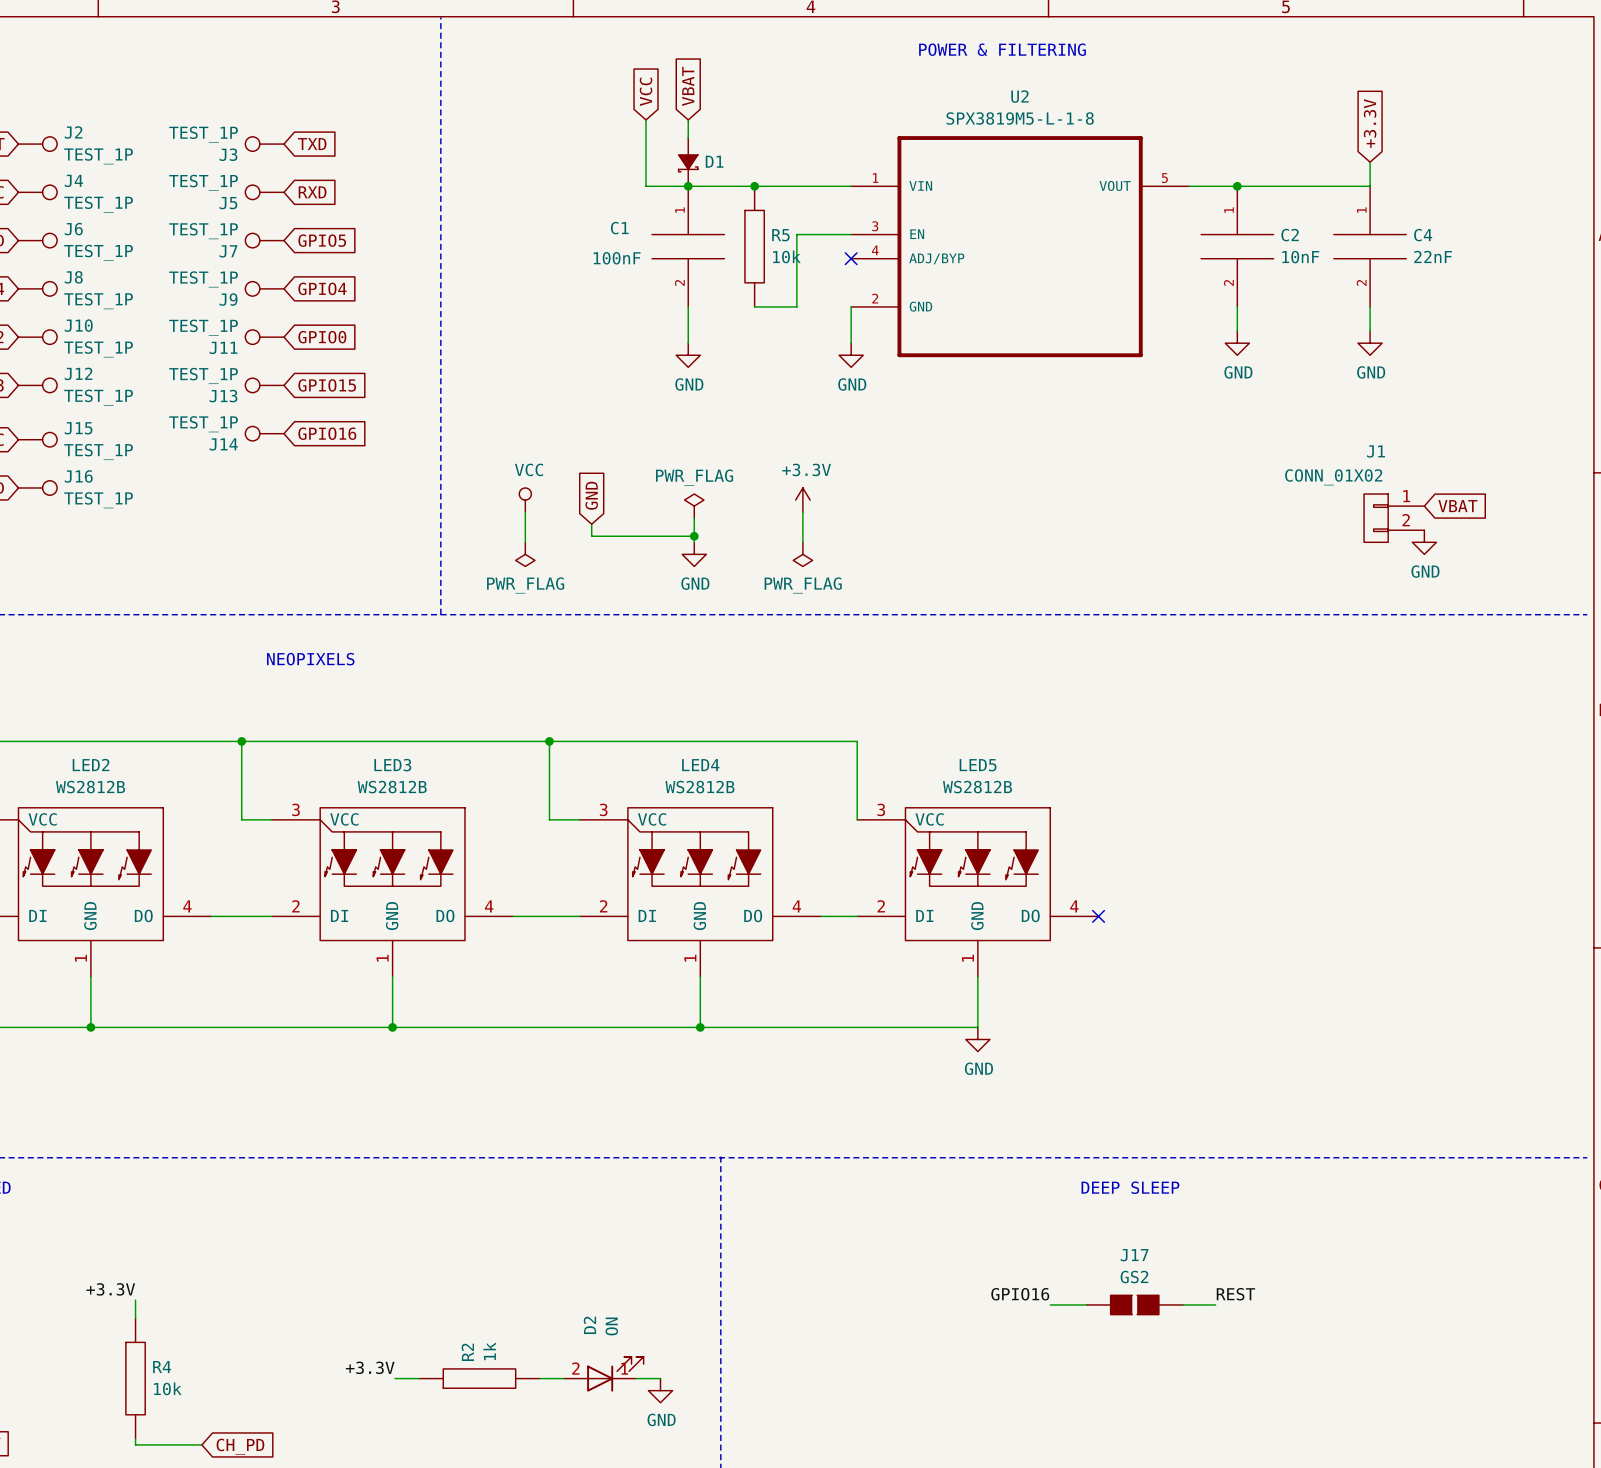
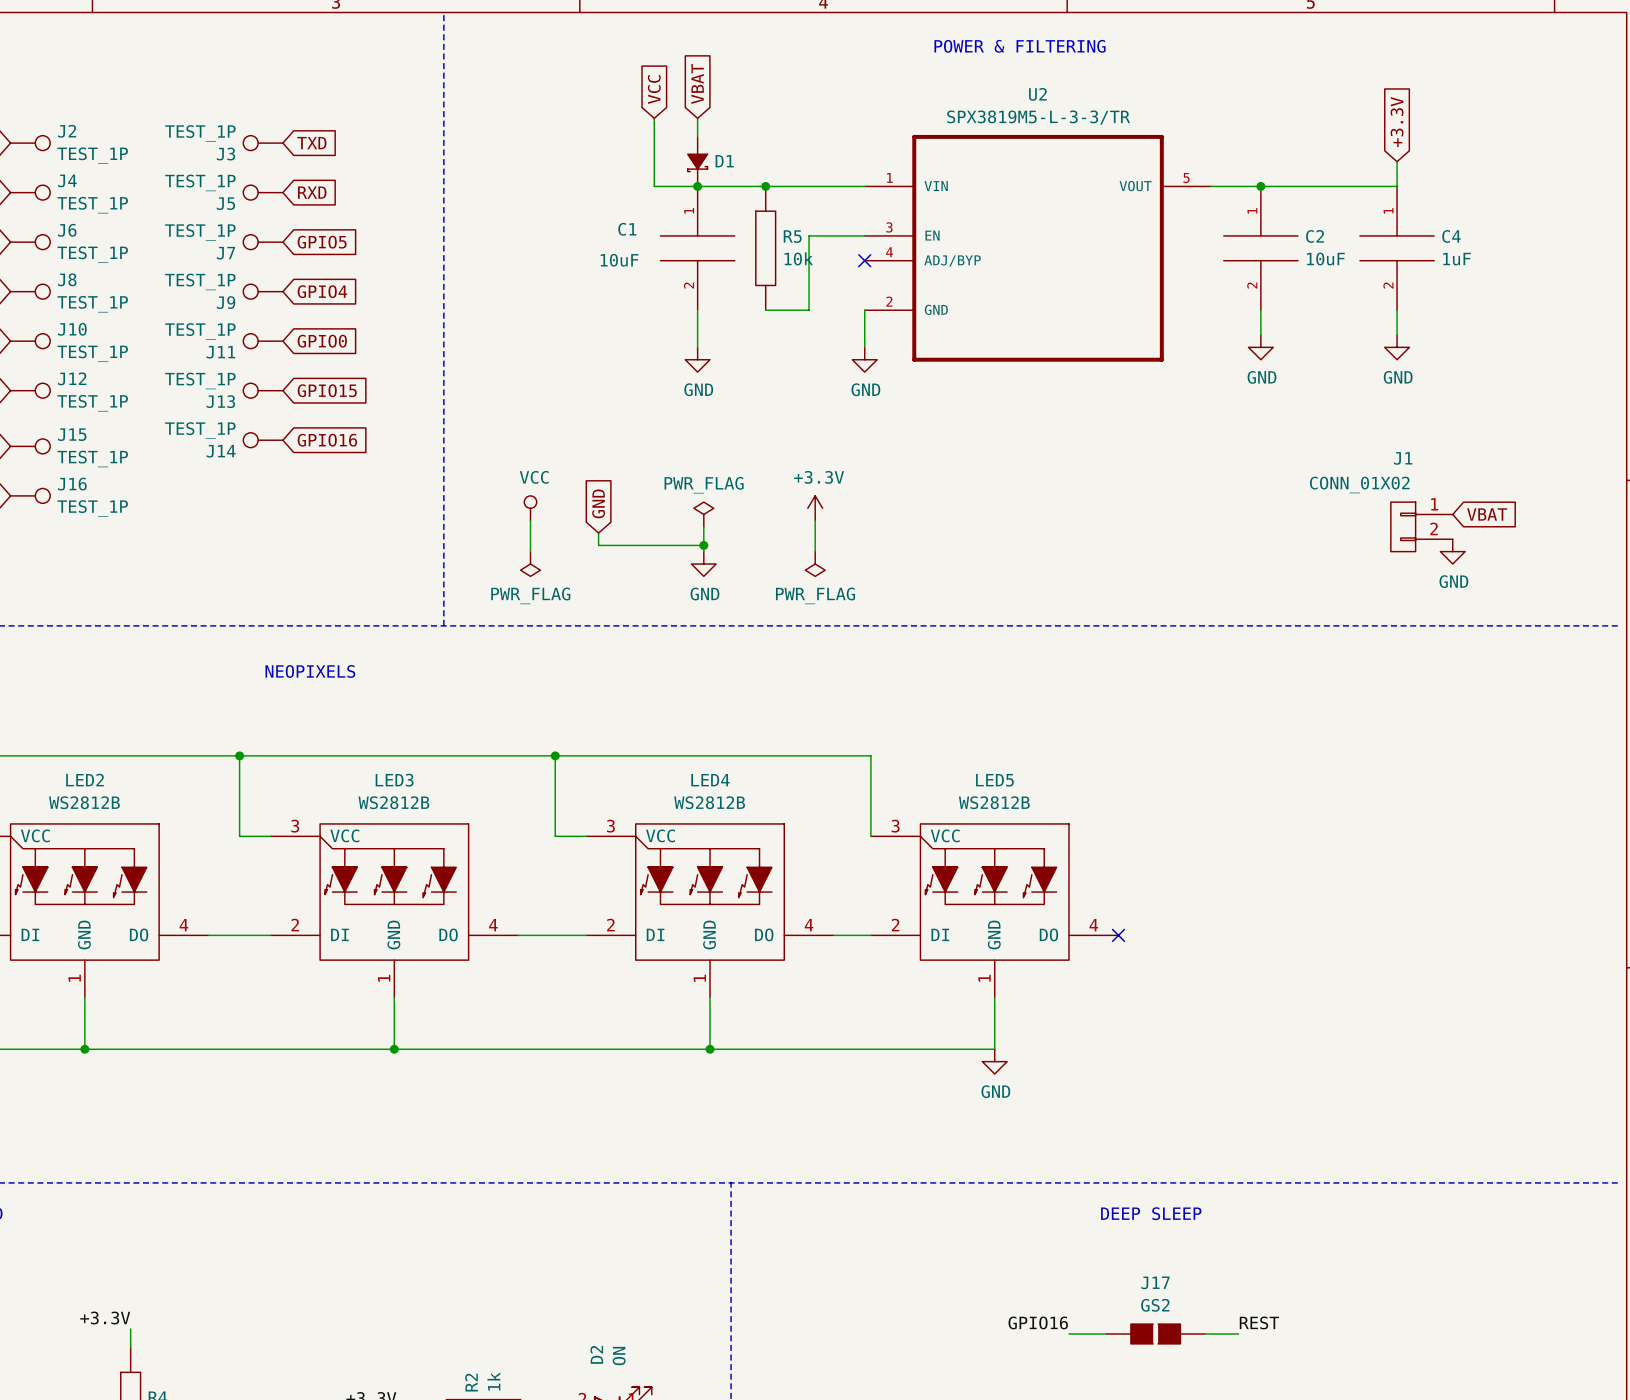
U2 value: SPX3819M5-L-1-8 (1020, 118) -> SPX3819M5-L-3-3/TR (1038, 117)
C4 value: 22nF (1433, 256) -> 1uF (1456, 259)
C2 value: 10nF (1300, 257) -> 10uF (1325, 259)
C1 value: 100nF (617, 258) -> 10uF (619, 260)

